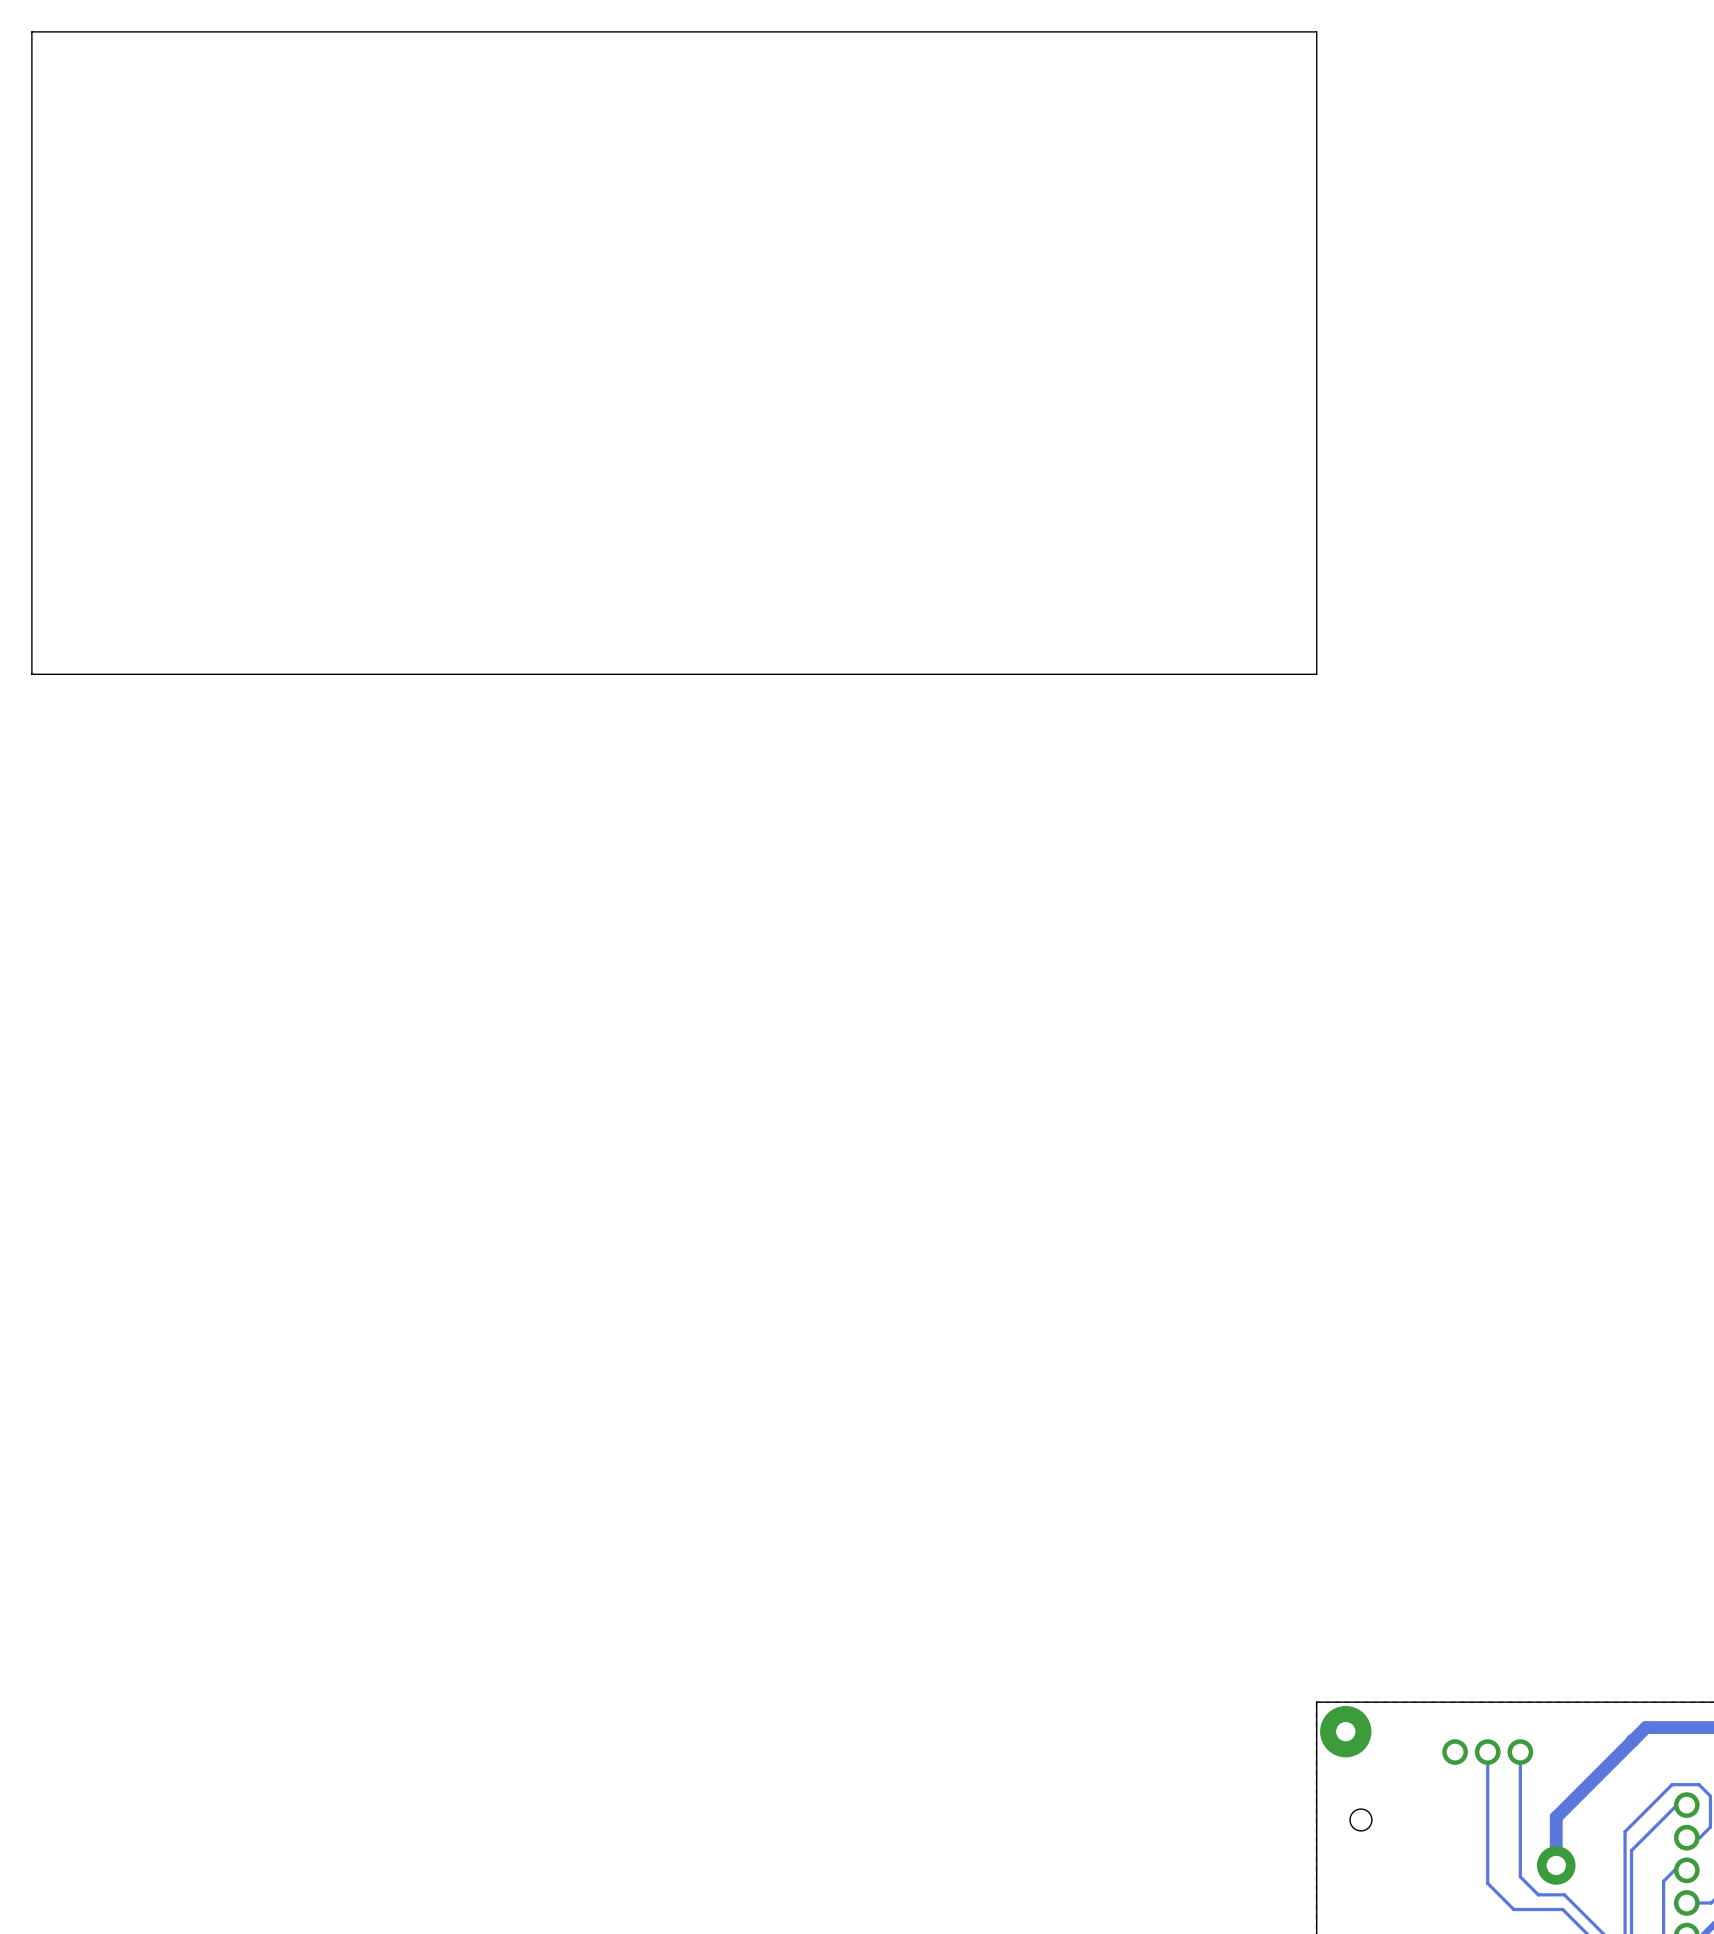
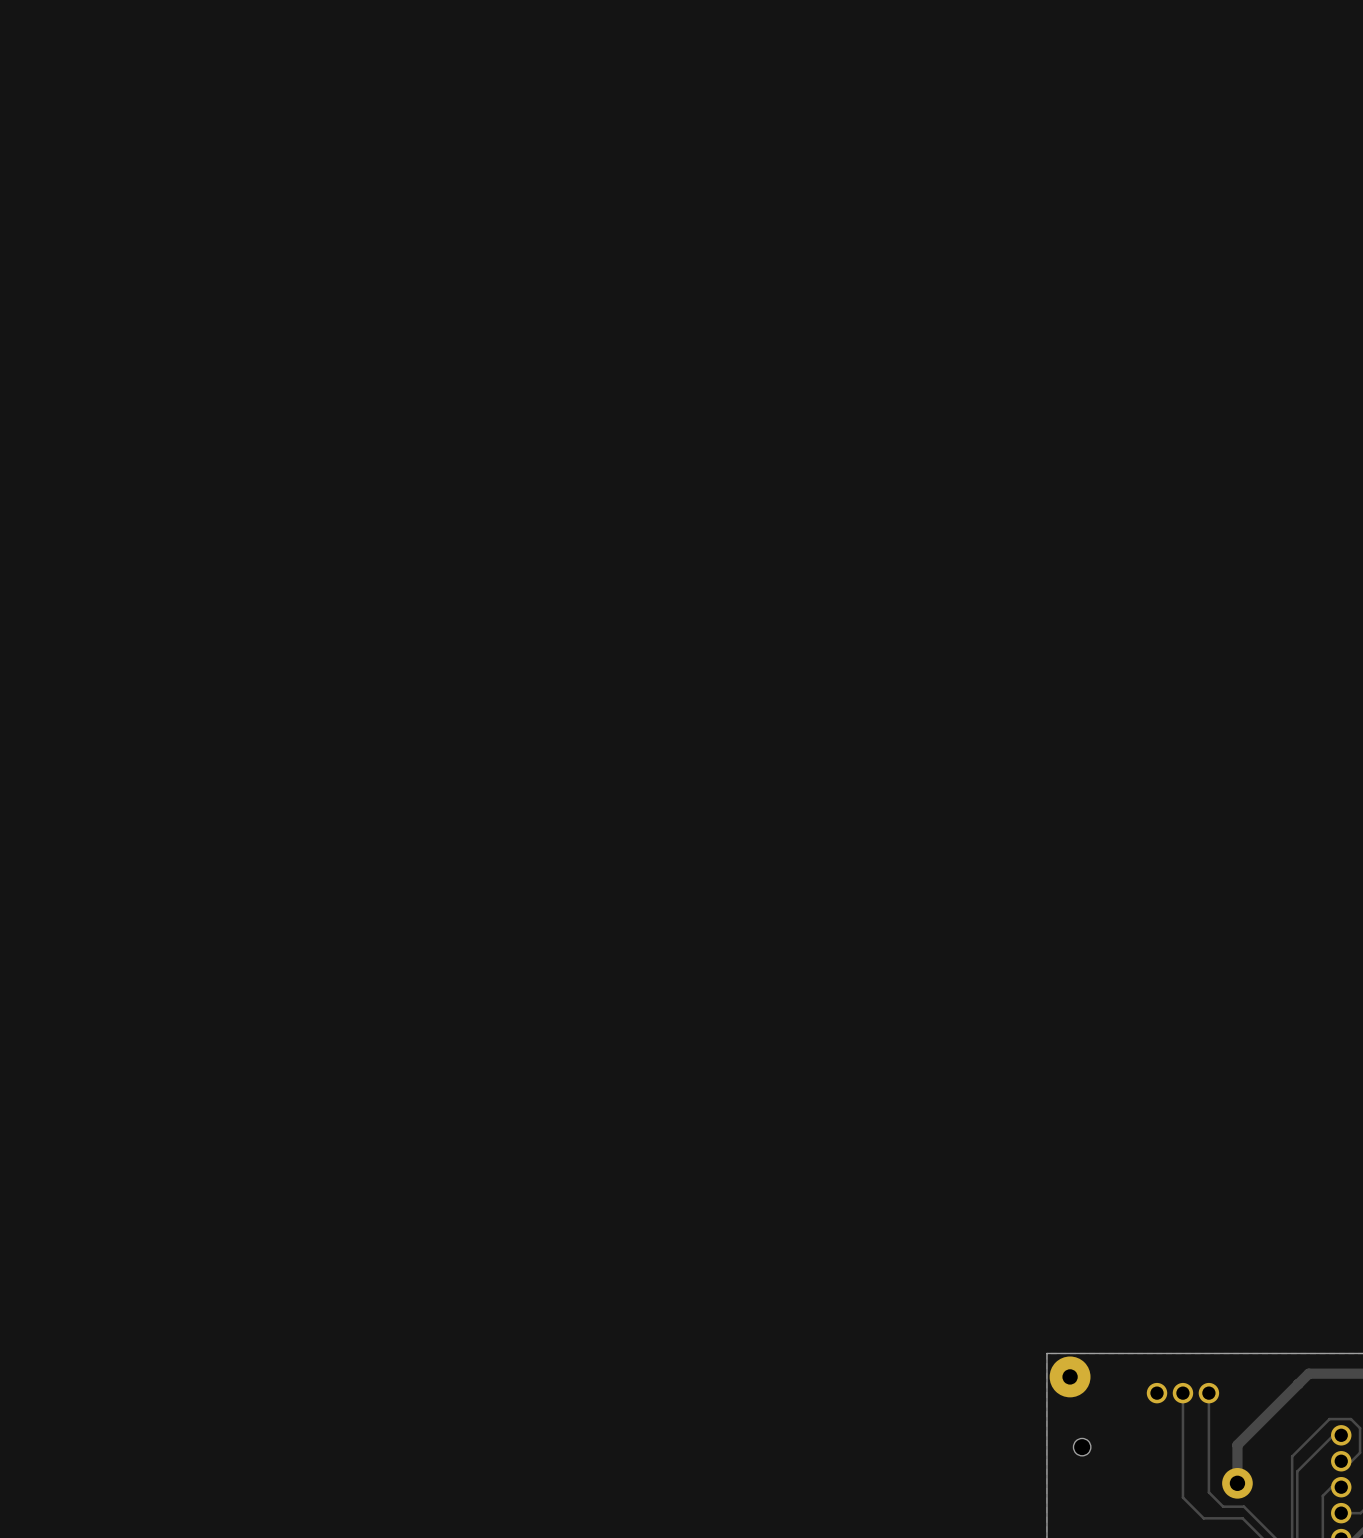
board edge: (1316, 31) (31, 31) (31, 674) (1316, 674) (1316, 31) -> none

